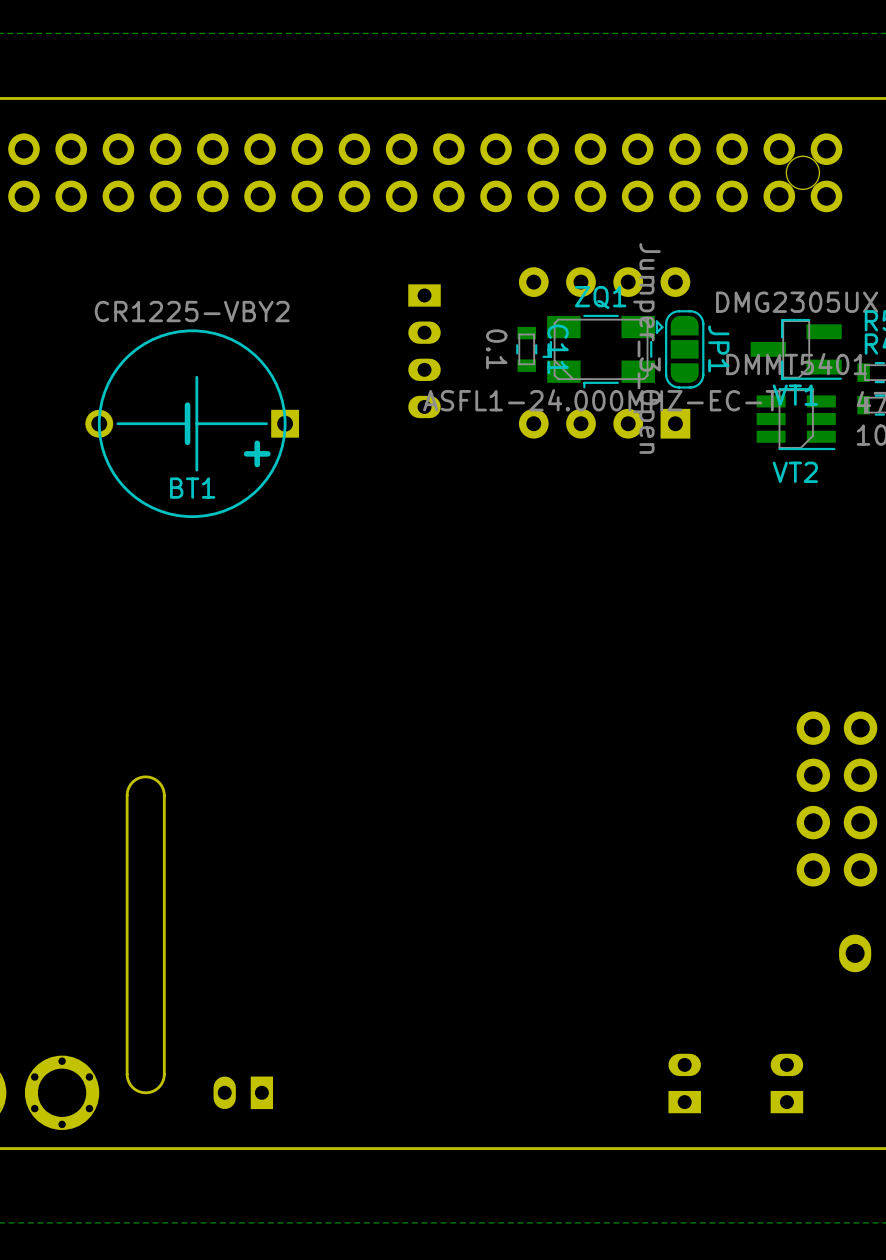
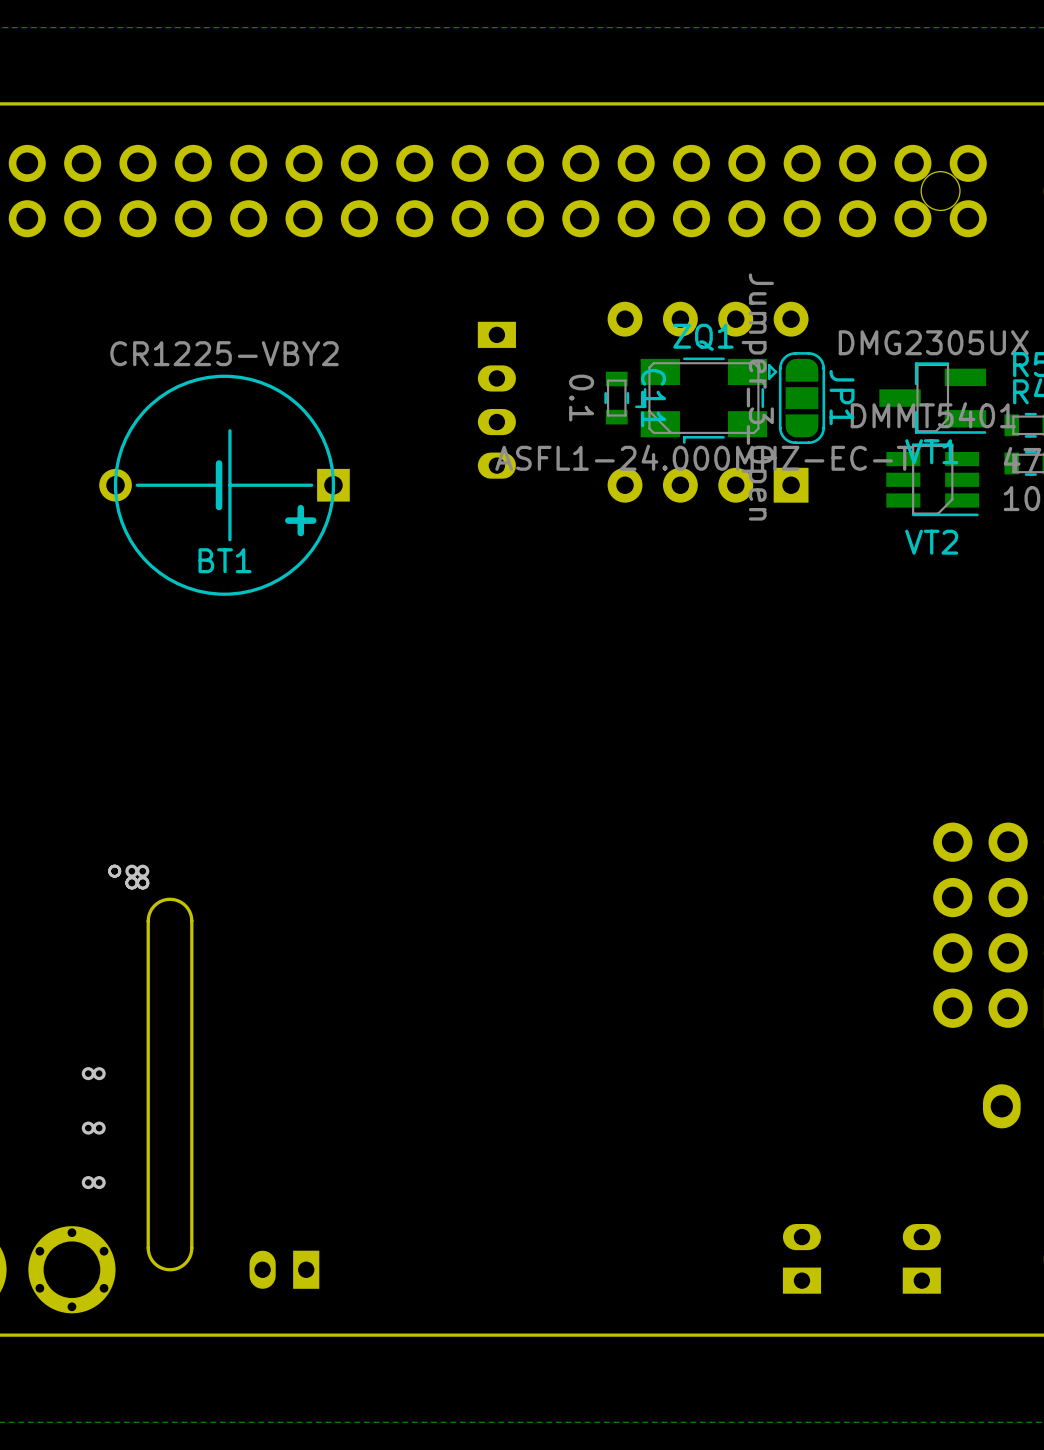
via: none -> (114, 871)
via: none -> (131, 871)
via: none -> (142, 871)
via: none -> (131, 882)
via: none -> (142, 882)
via: none -> (88, 1073)
via: none -> (99, 1073)
via: none -> (88, 1128)
via: none -> (99, 1128)
via: none -> (88, 1182)
via: none -> (99, 1182)

